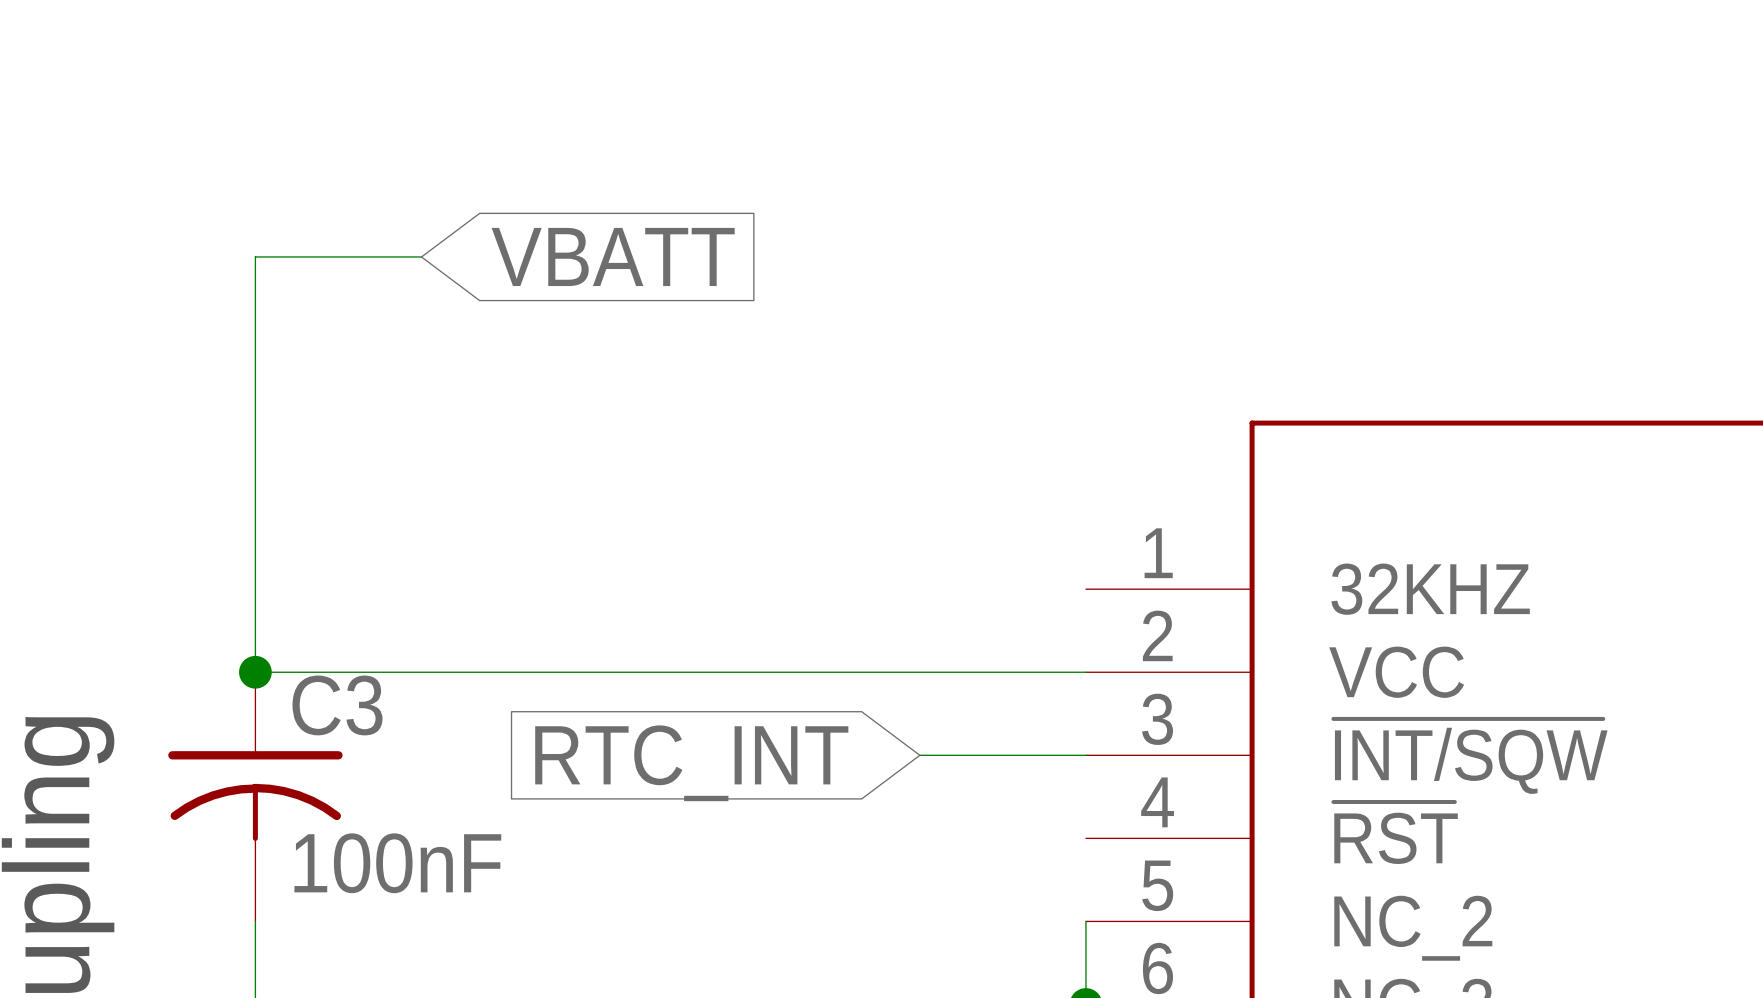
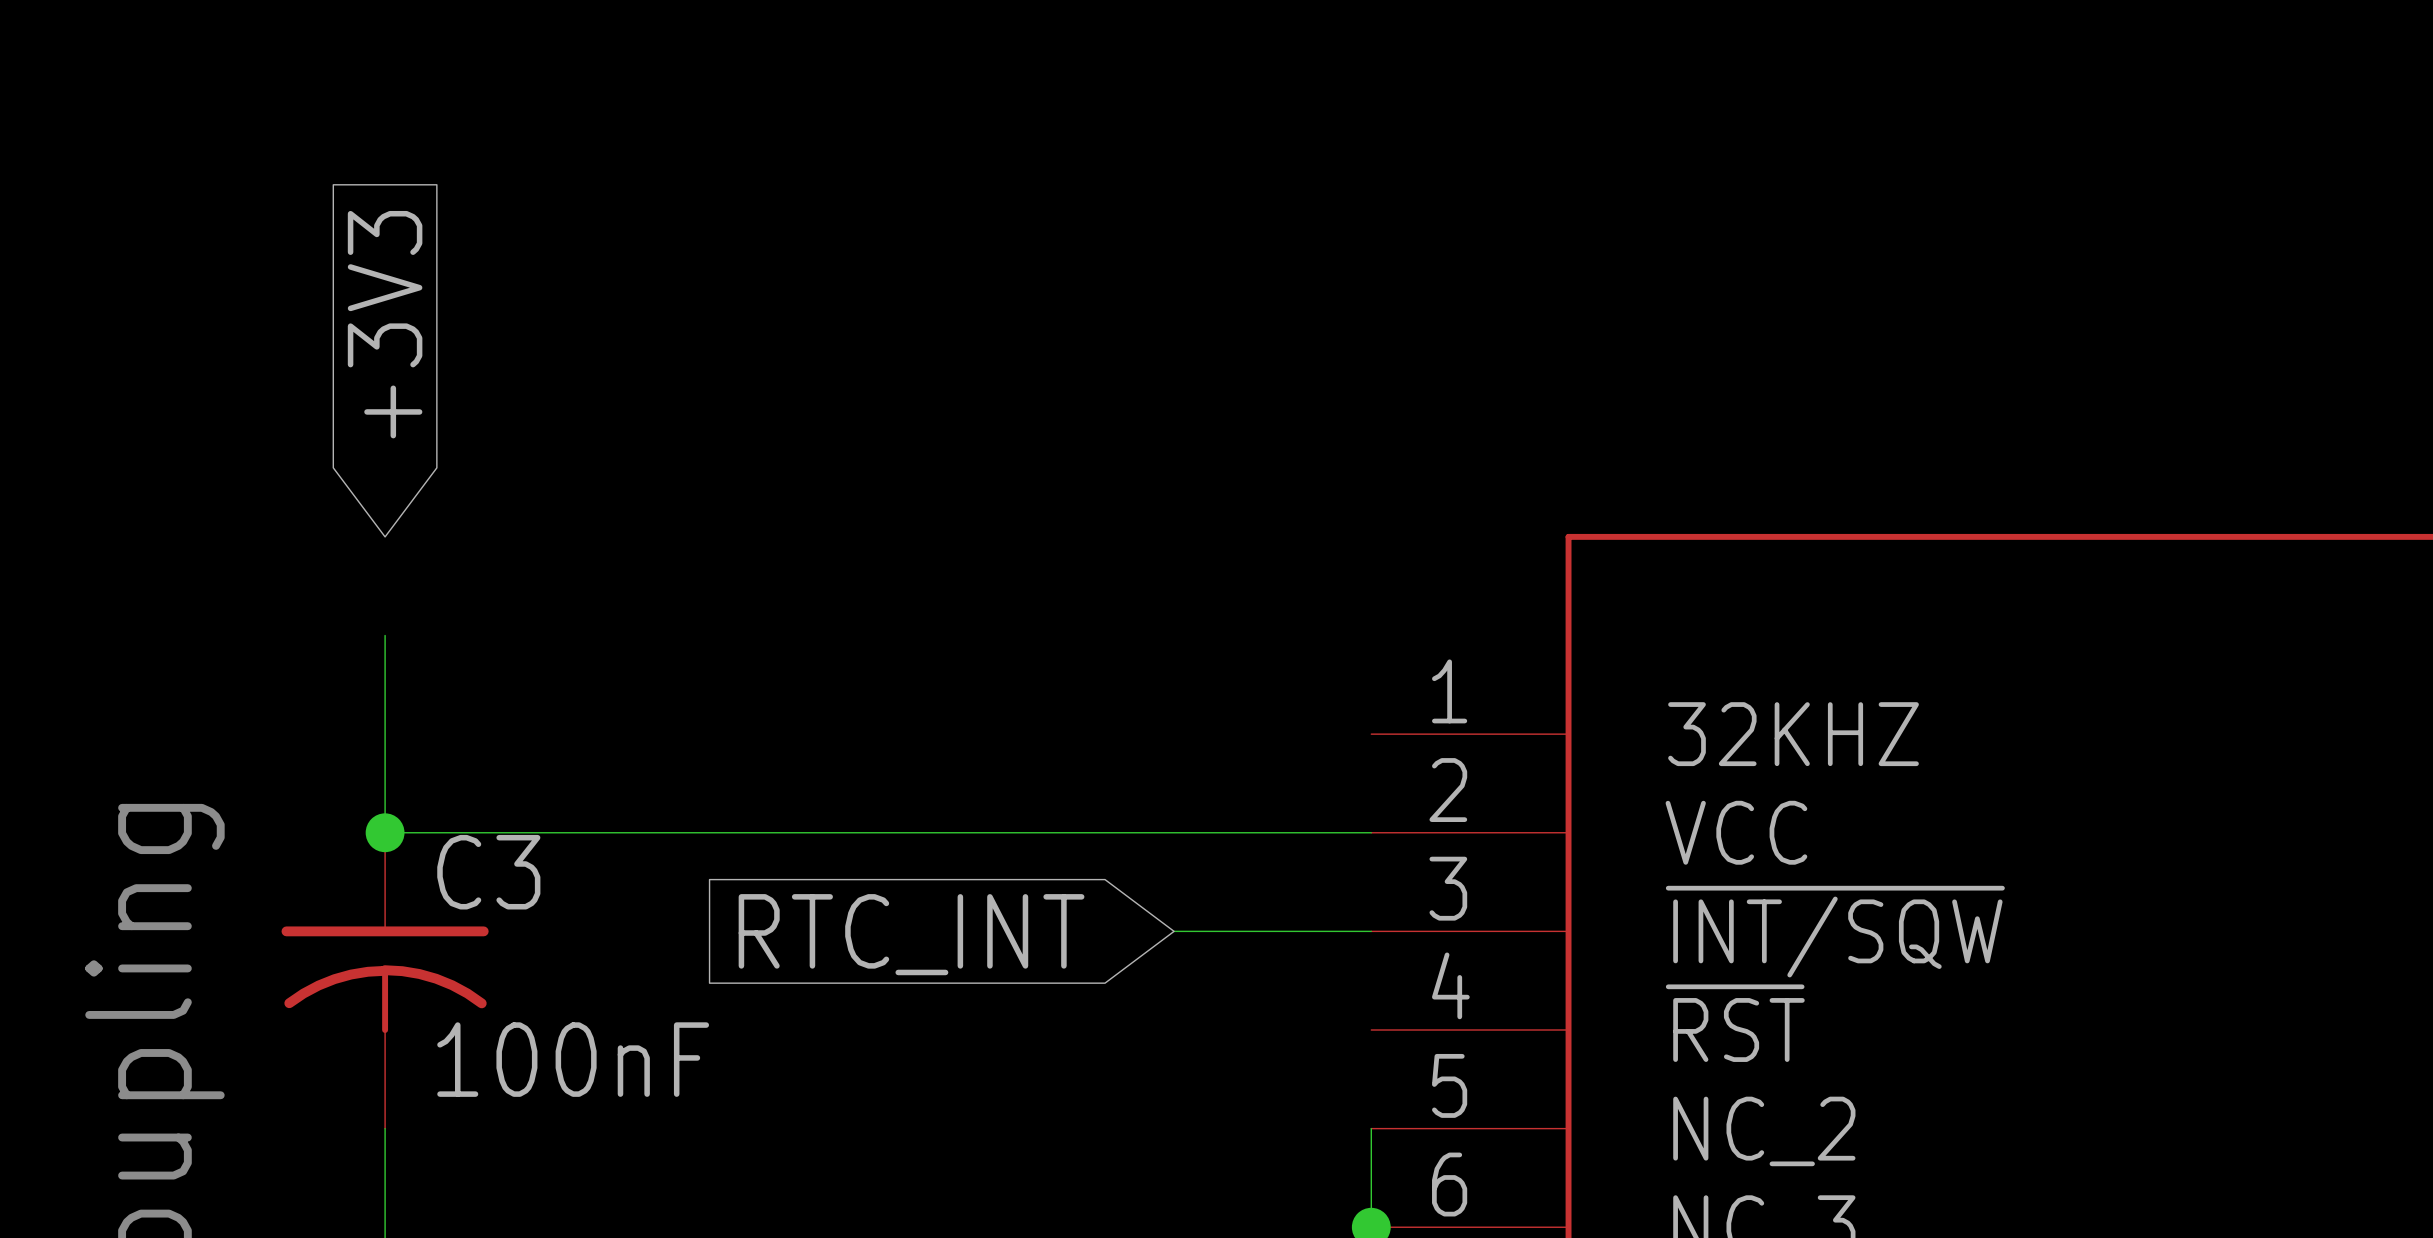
wire: (421, 256) (255, 256) (255, 506) -> none
global label: VBATT (613, 256) -> none
global label: none -> +3V3 (385, 324)

